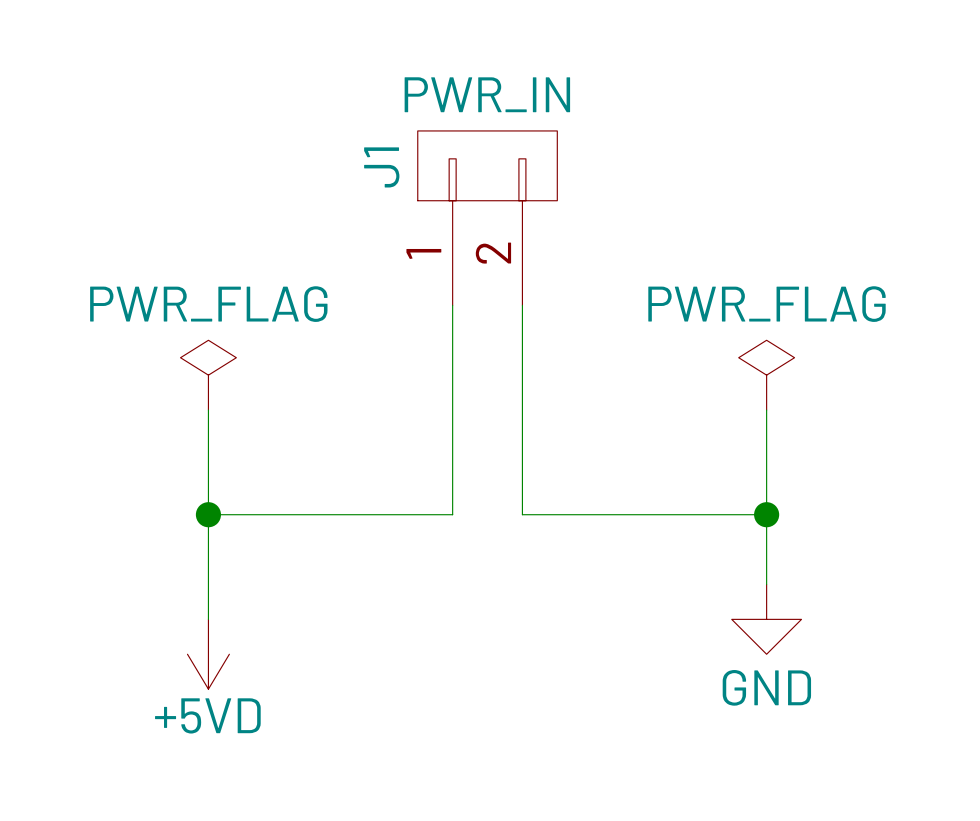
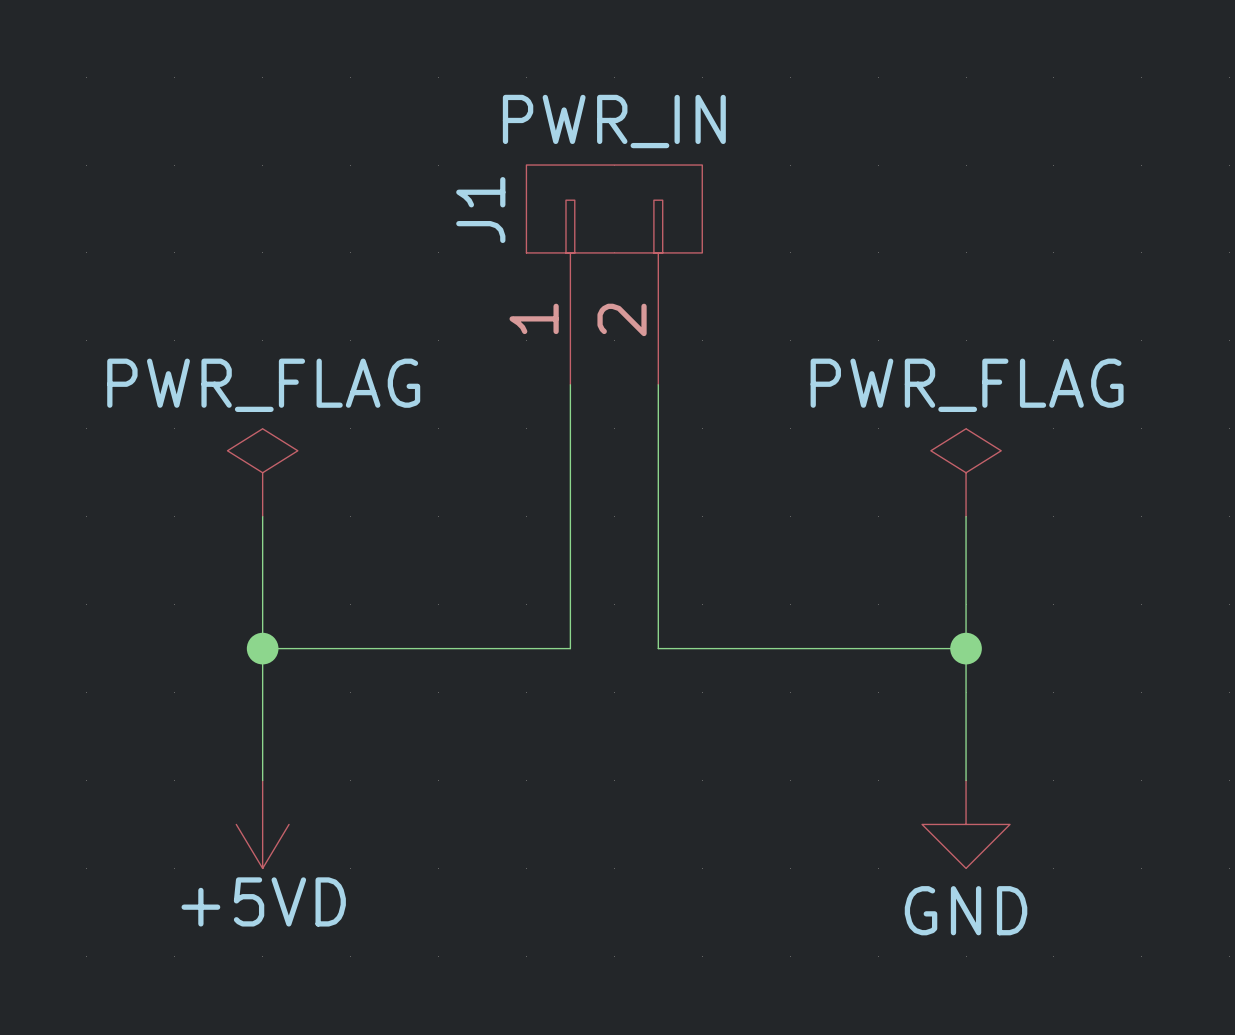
power symbol position: GND (766, 619) -> GND (966, 824)

